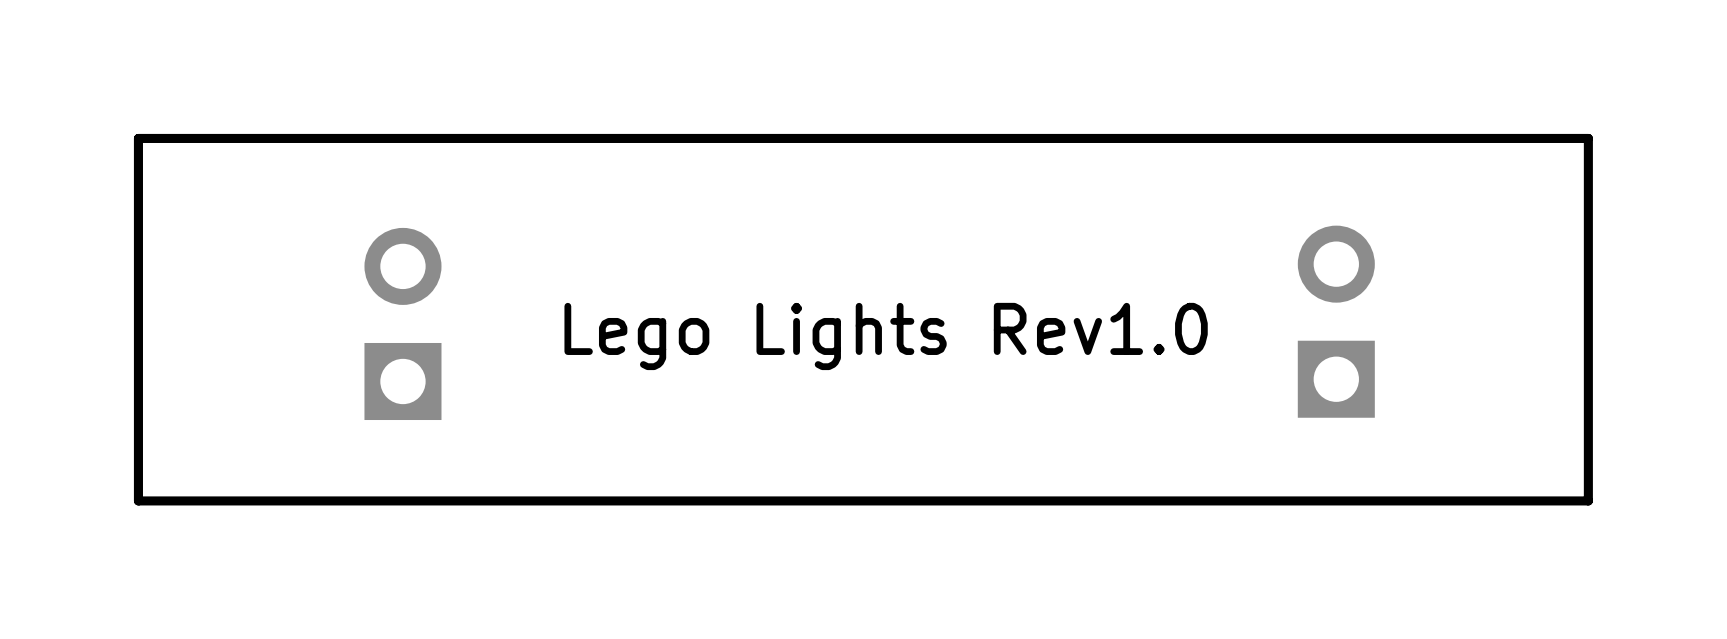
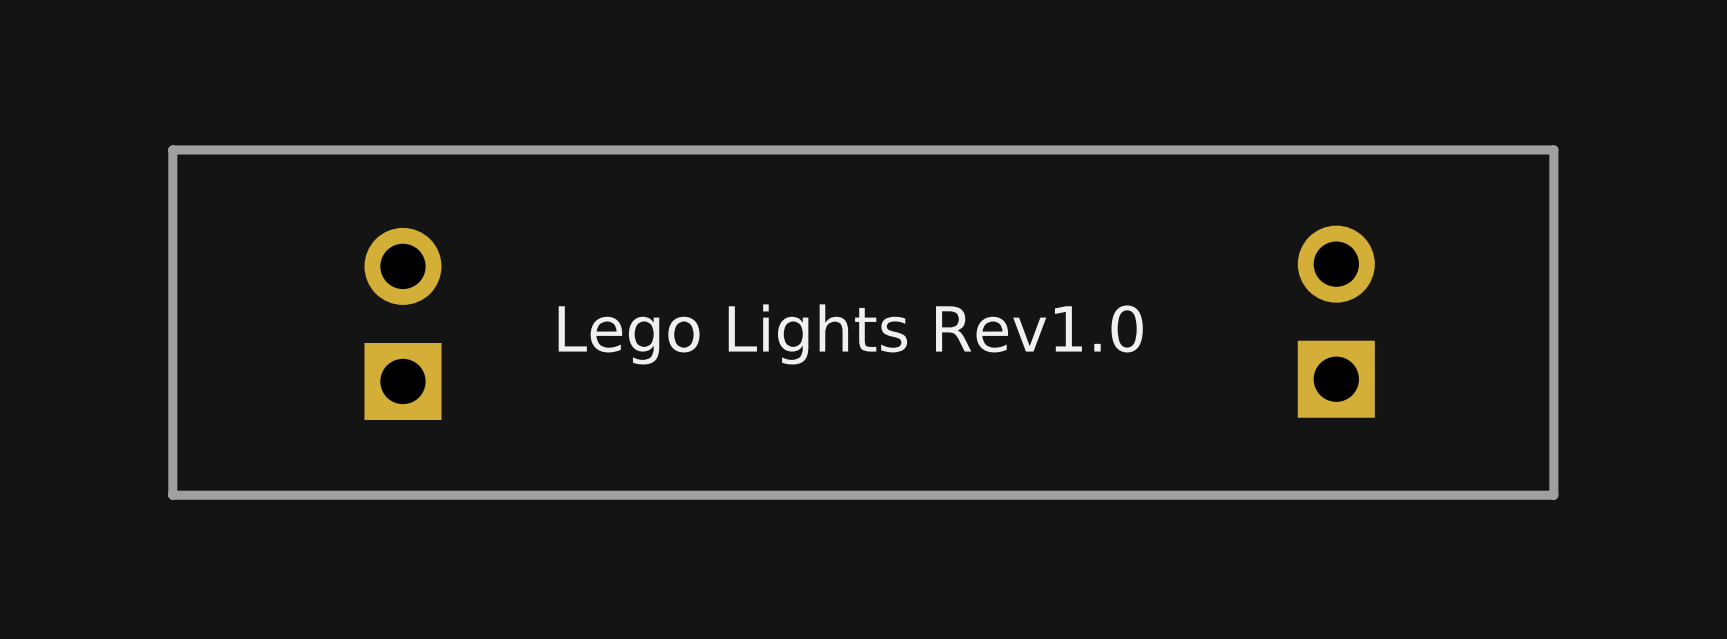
board edge: (1588, 138) (138, 138) (138, 500) (1588, 500) (1588, 138) -> (1553, 149) (1553, 495) (172, 495) (172, 149) (1553, 149)

